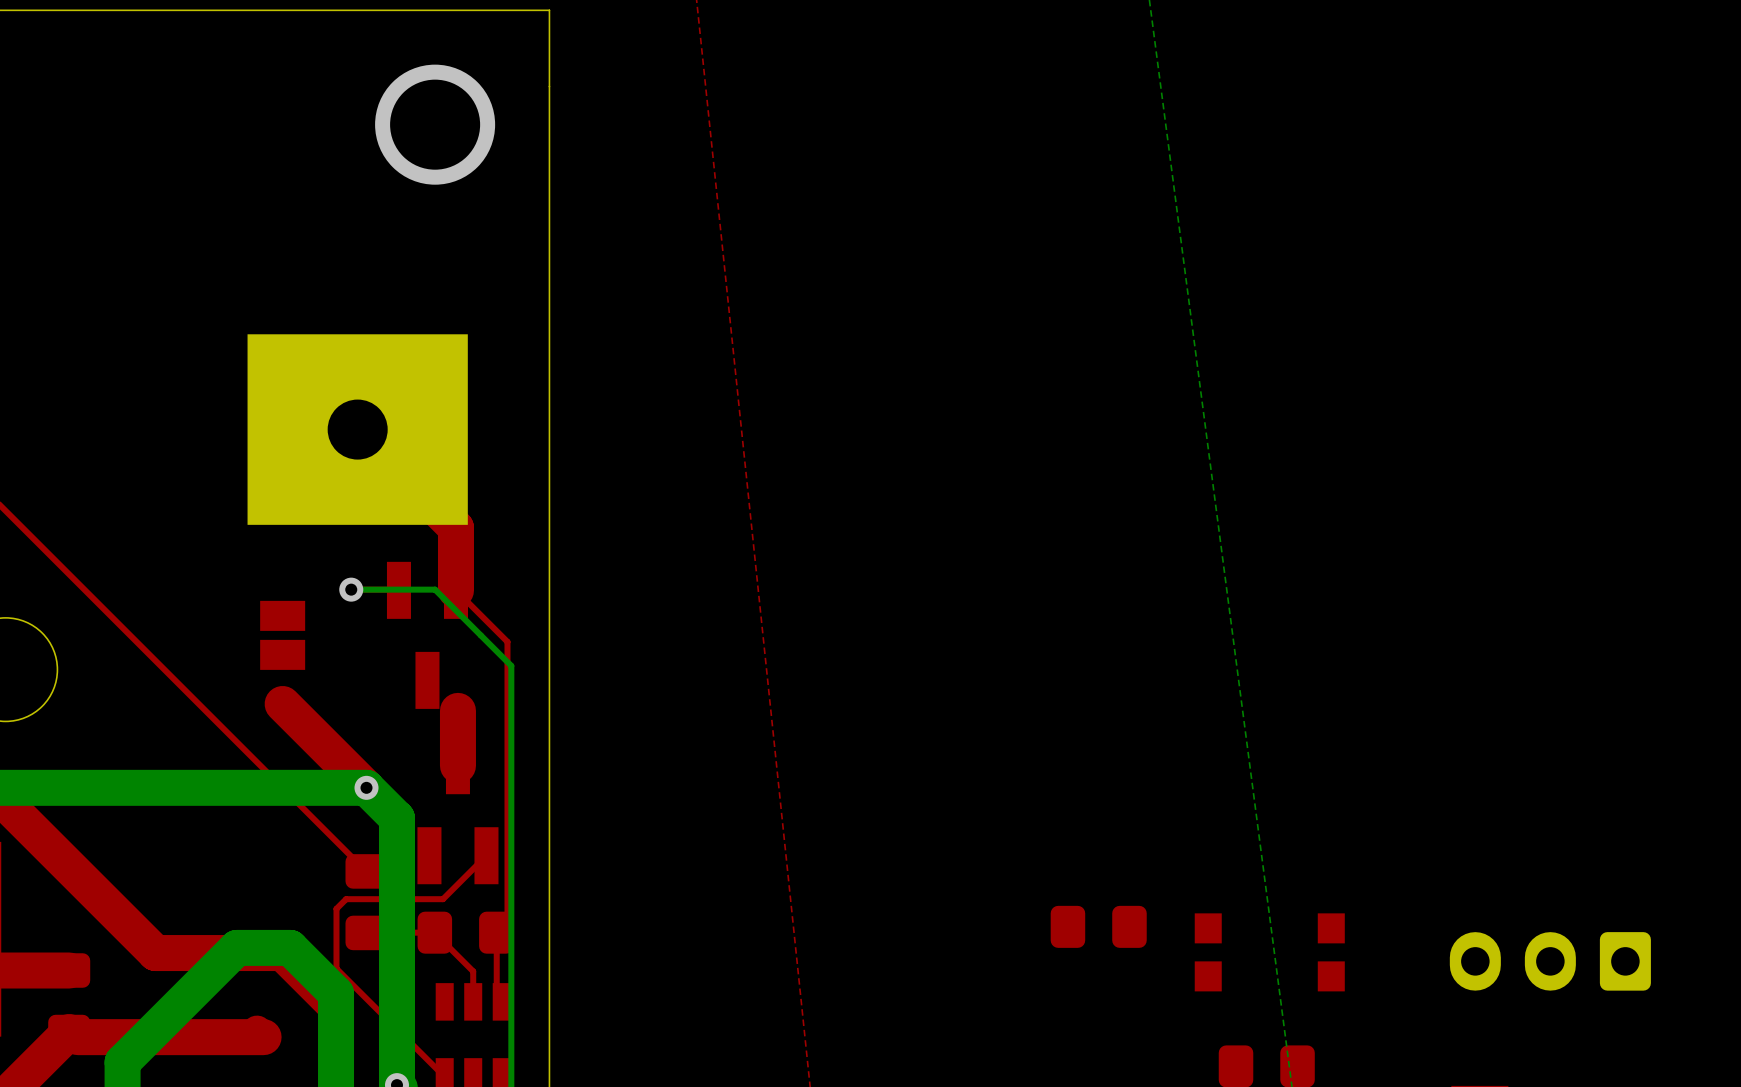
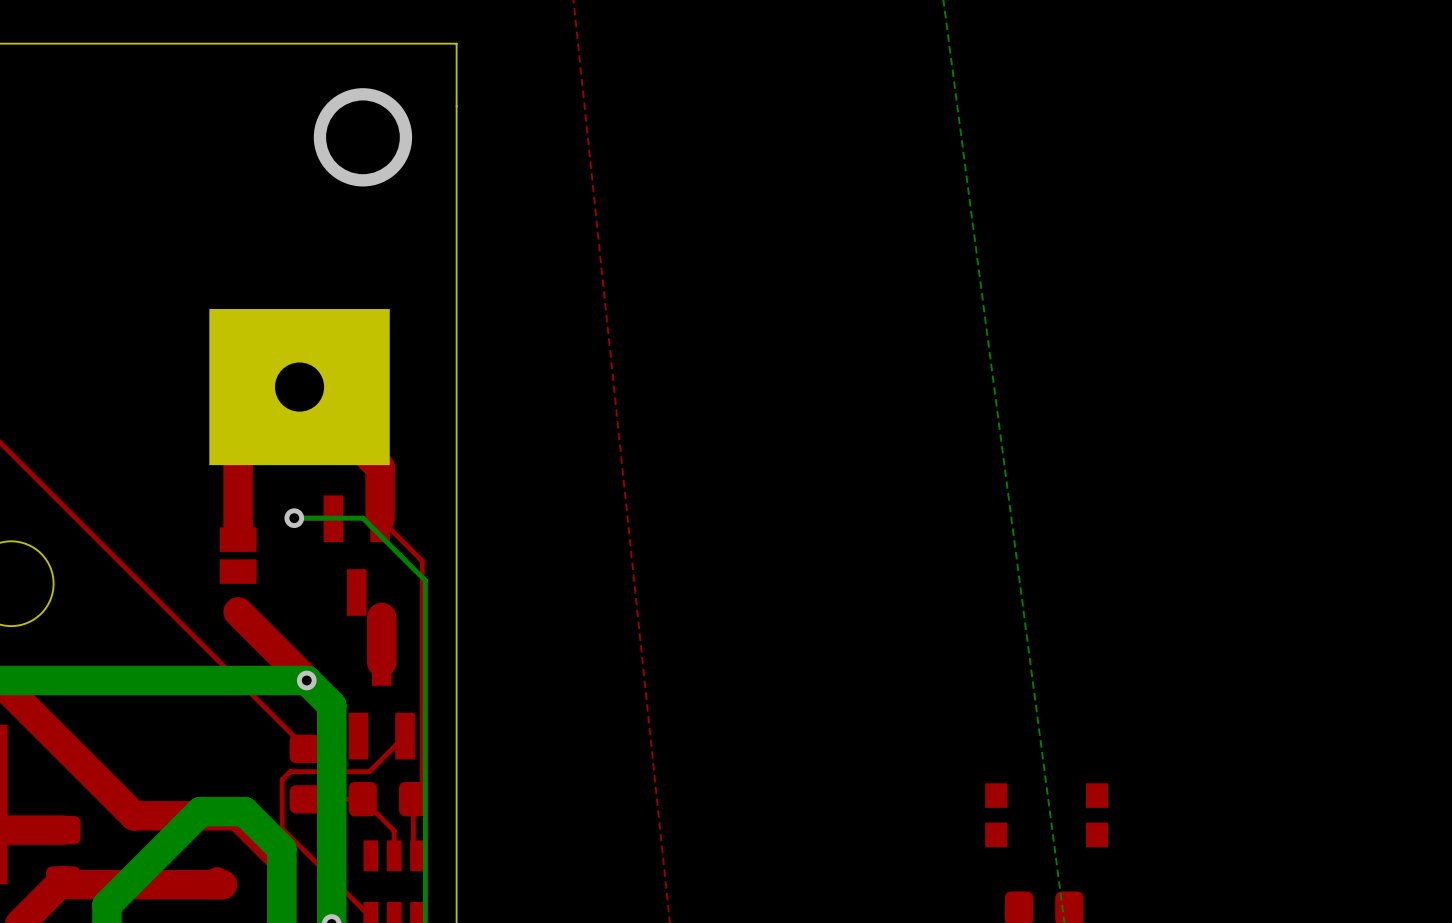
top track: none -> (238, 448) (238, 537)
part: (1098, 926) -> none
part: (1550, 961) -> none

